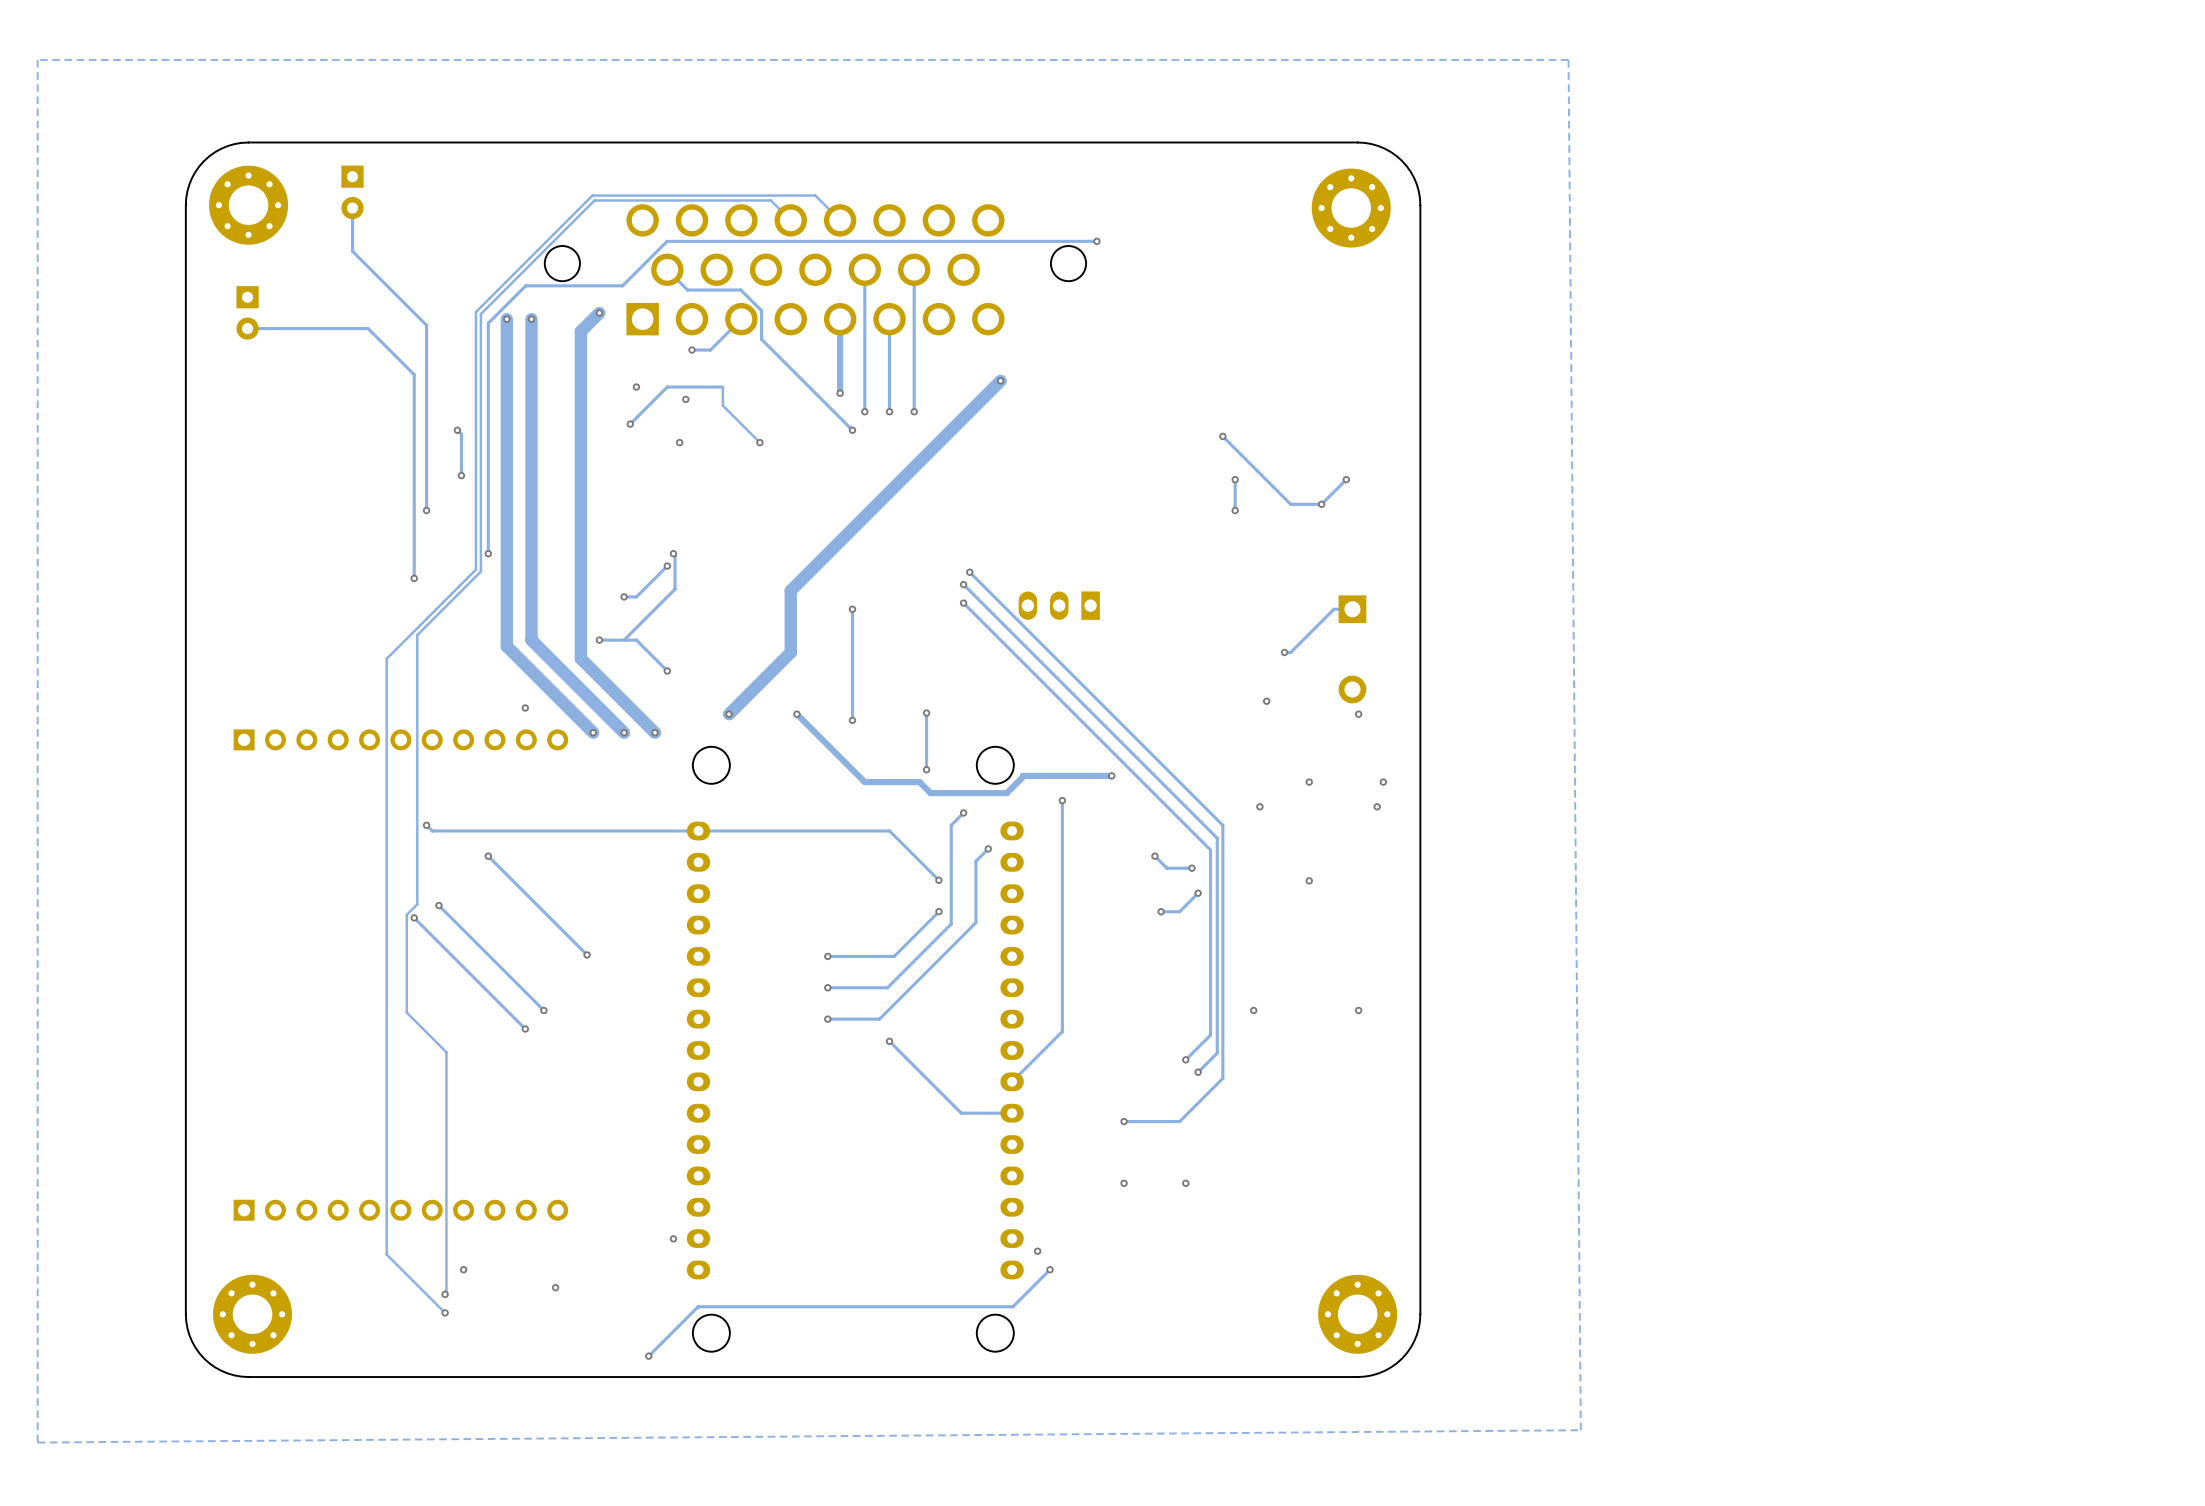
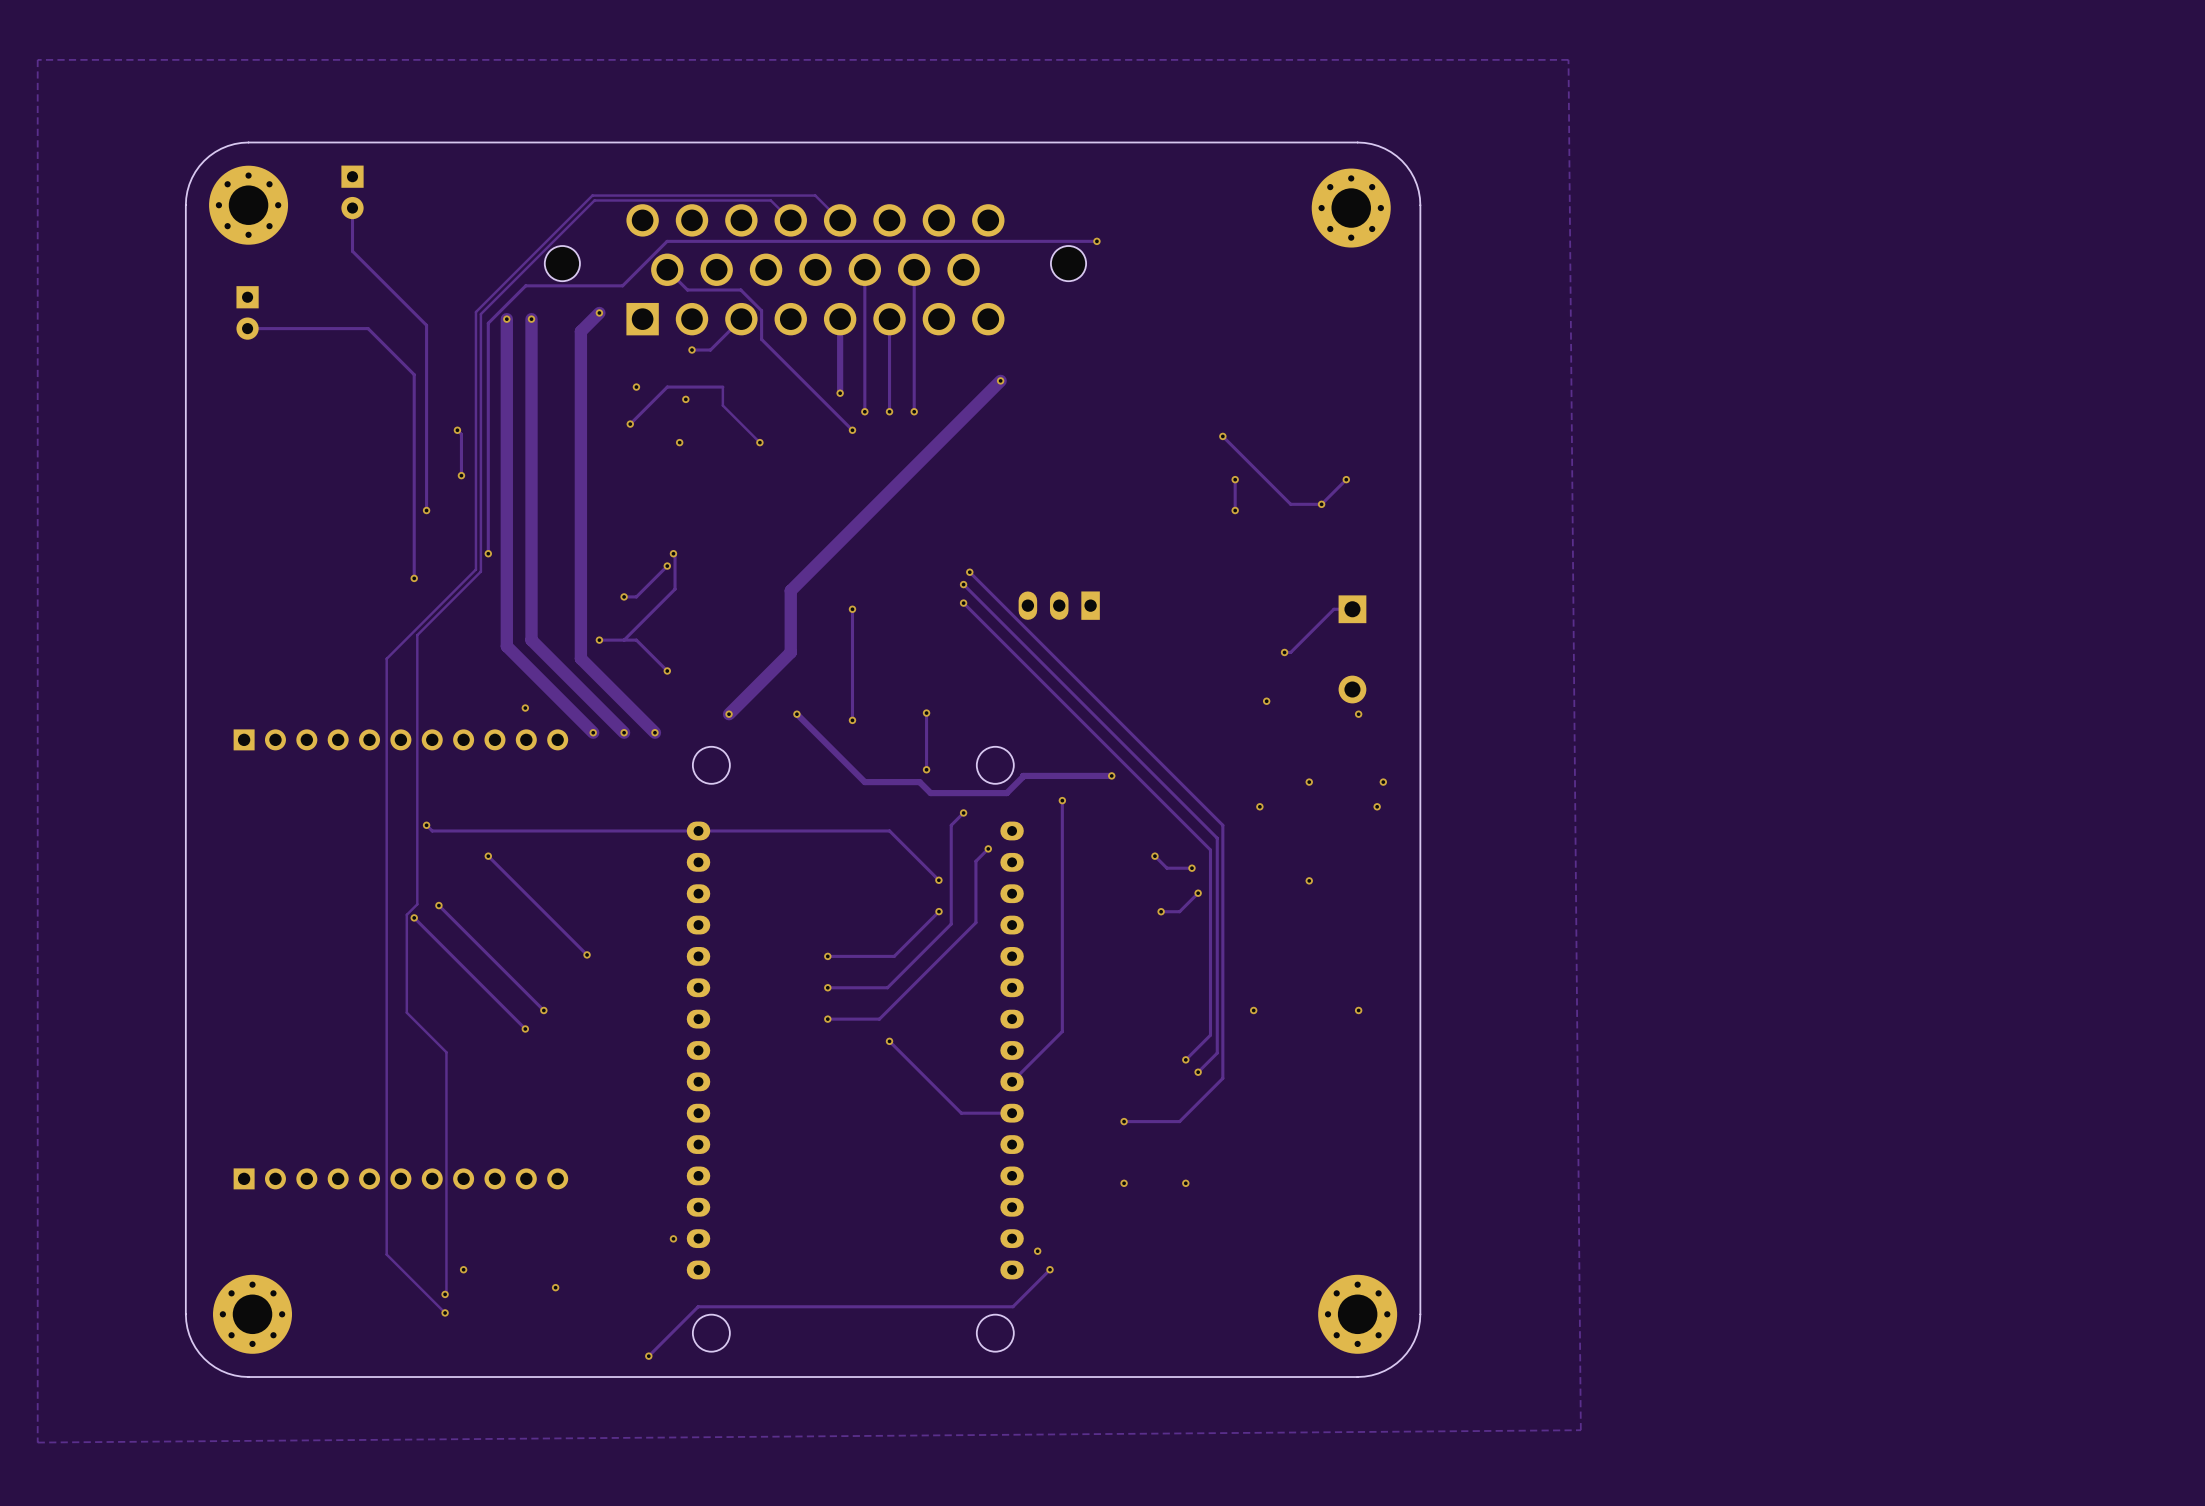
part position: (400, 1210) -> (400, 1178)

